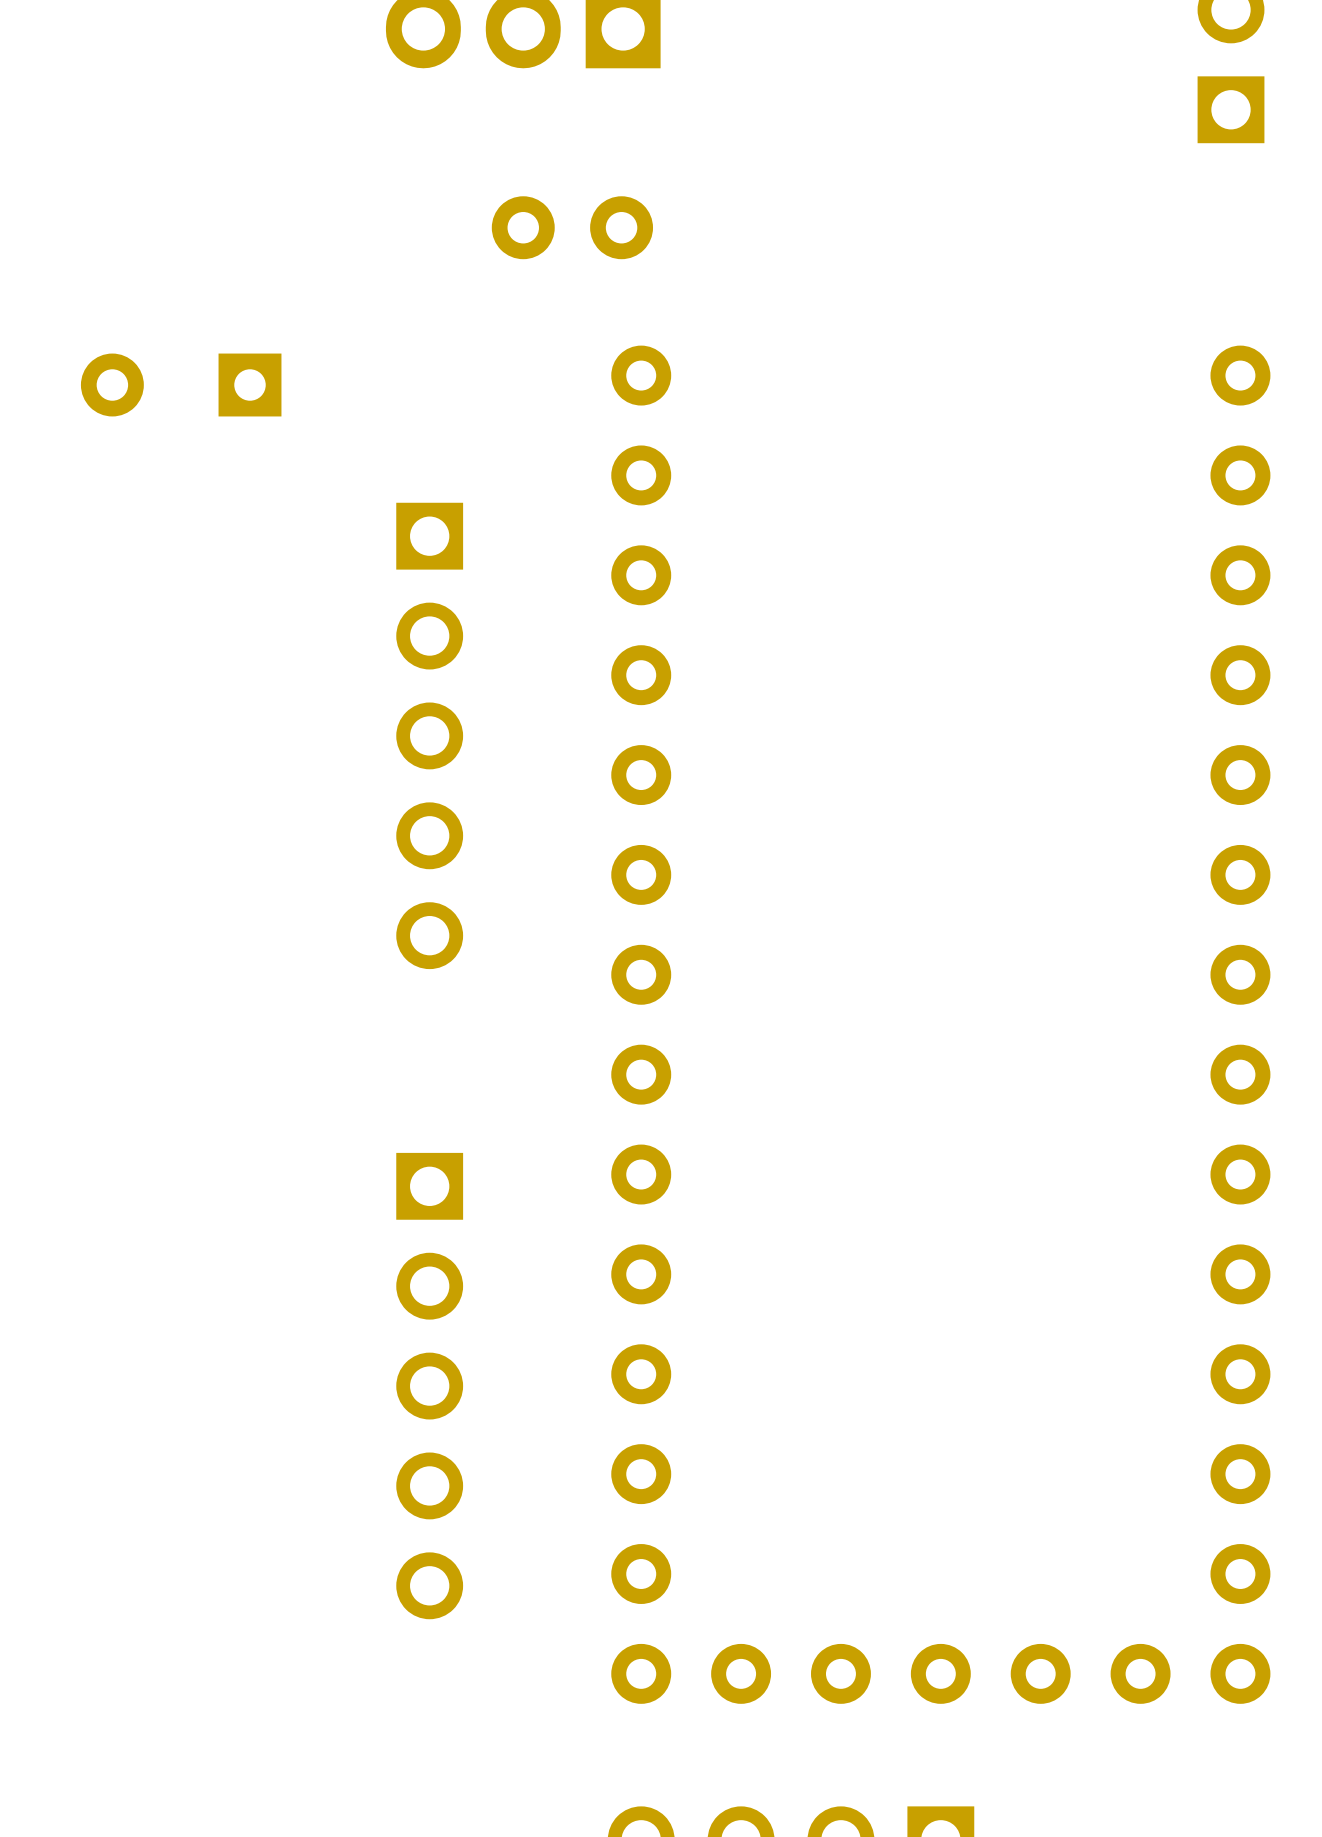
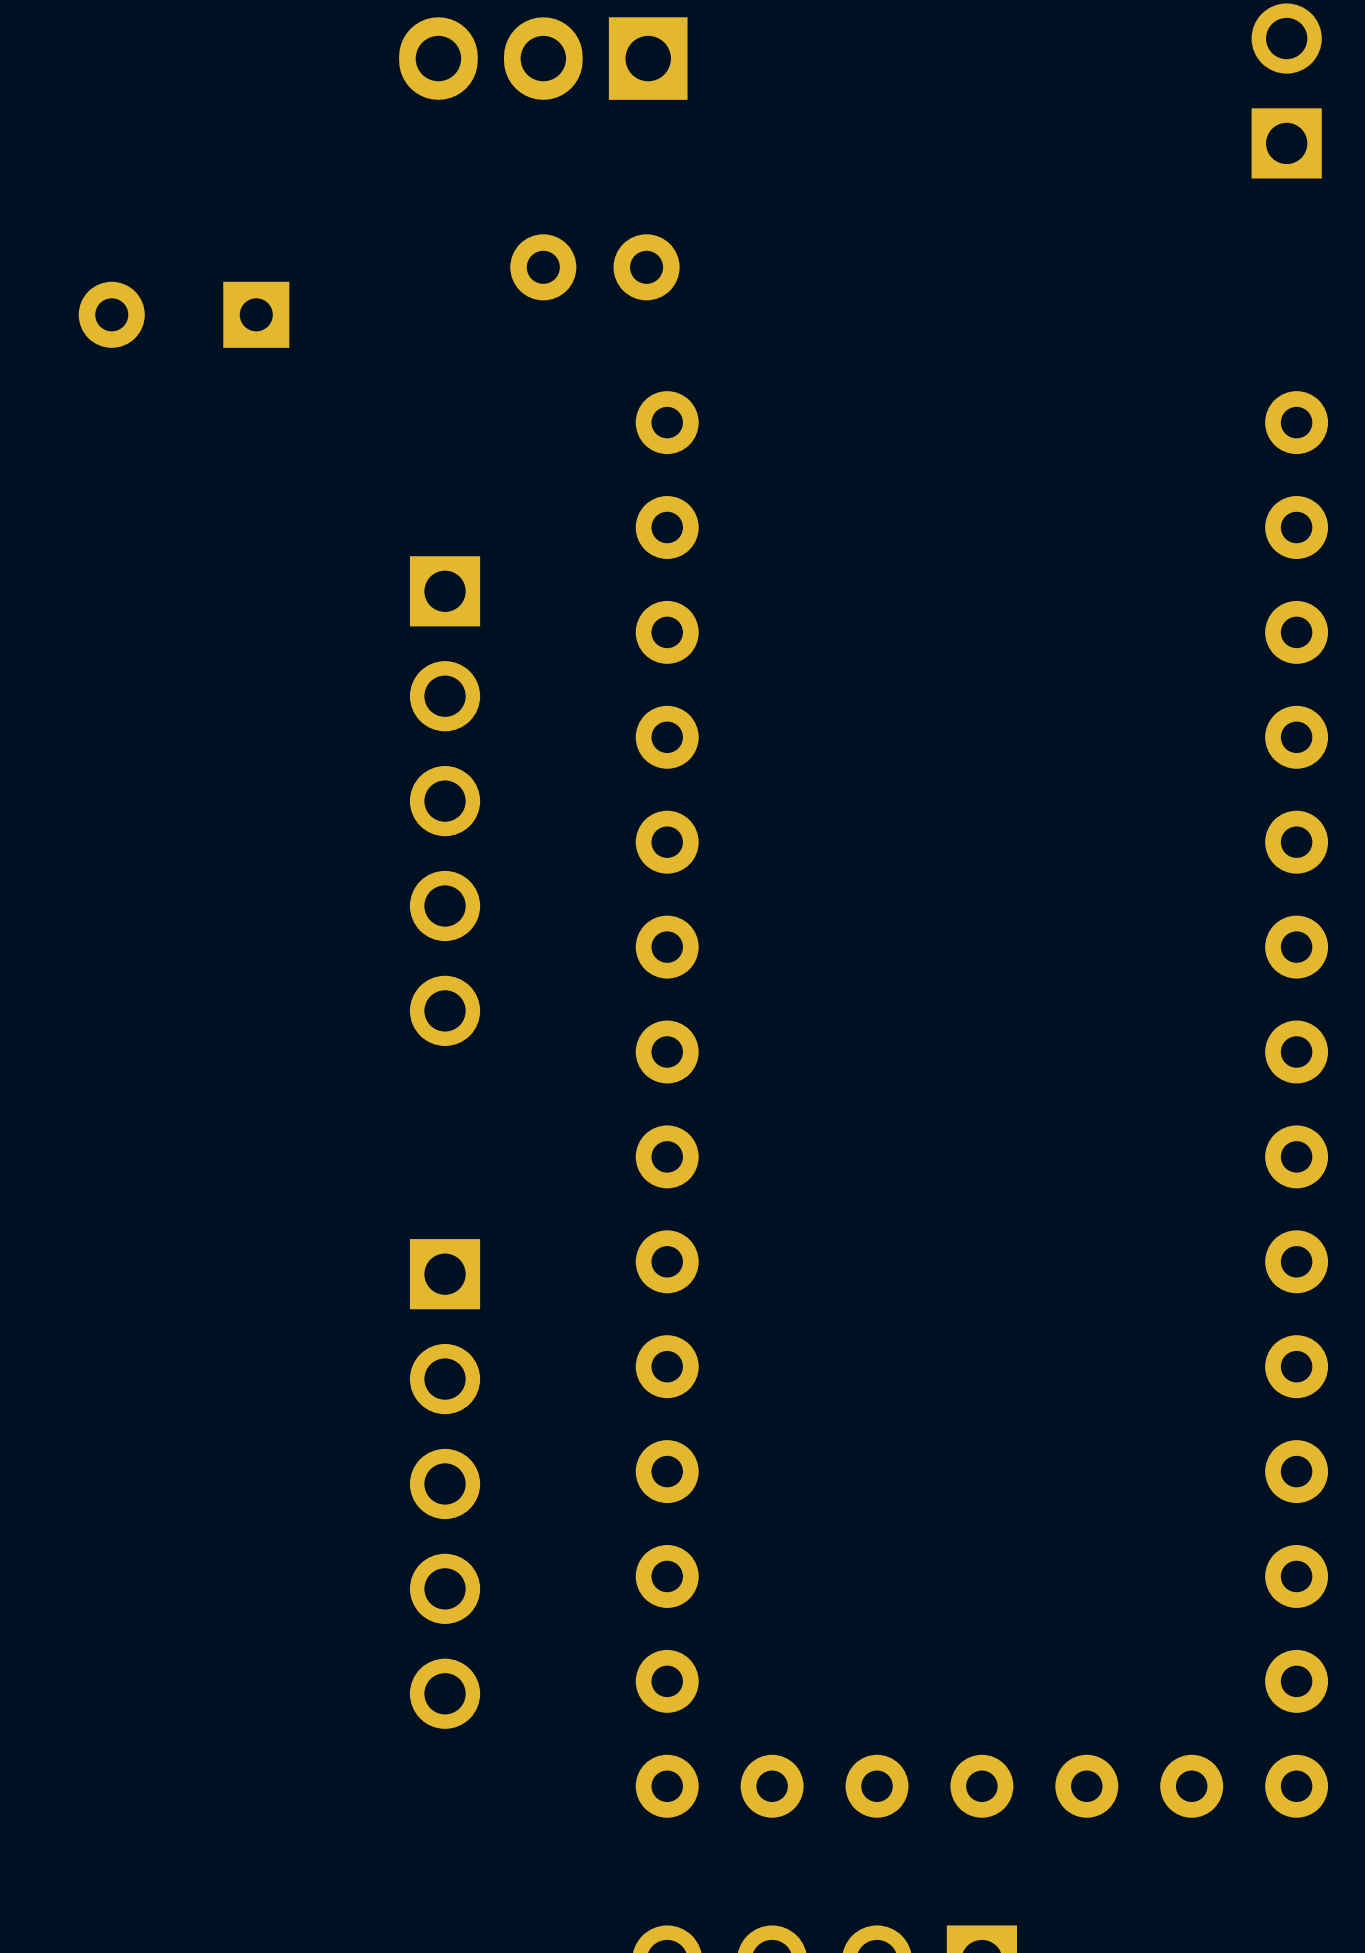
part position: (181, 385) -> (184, 314)

